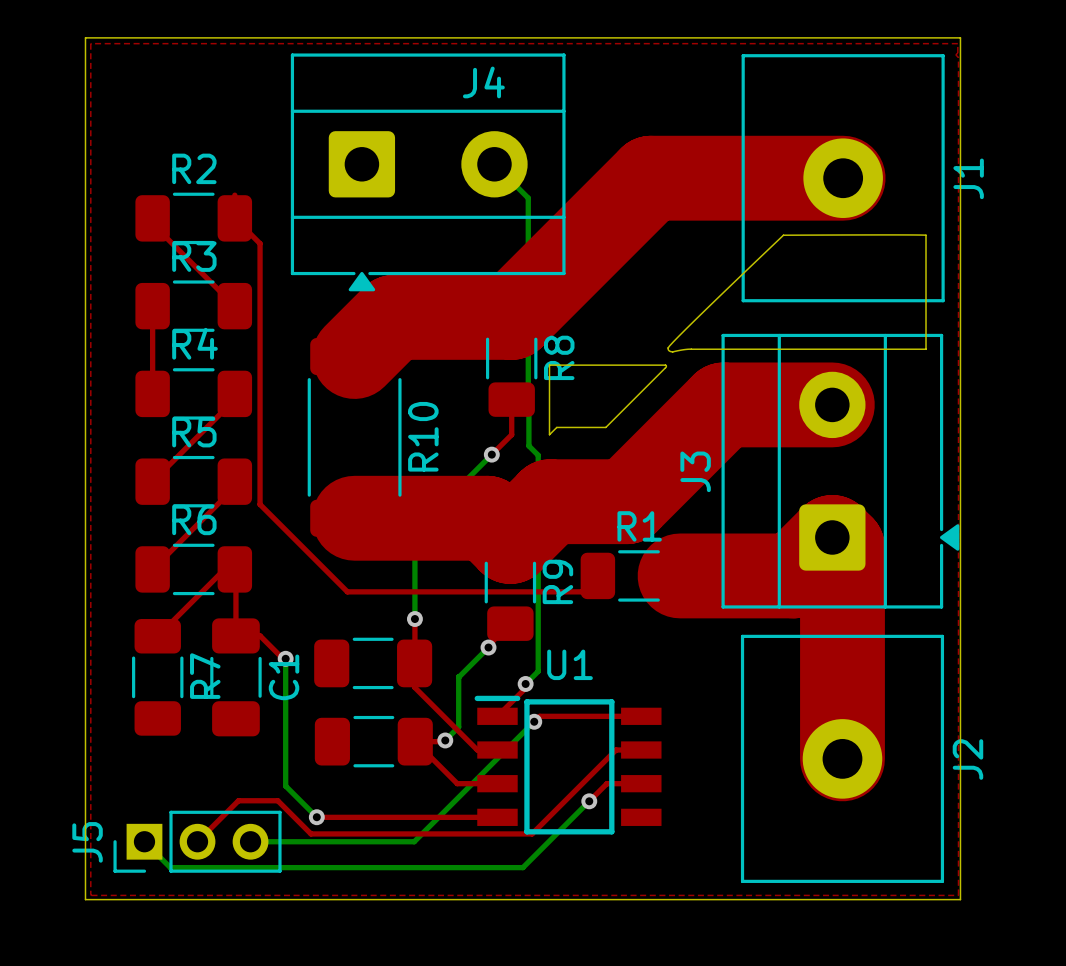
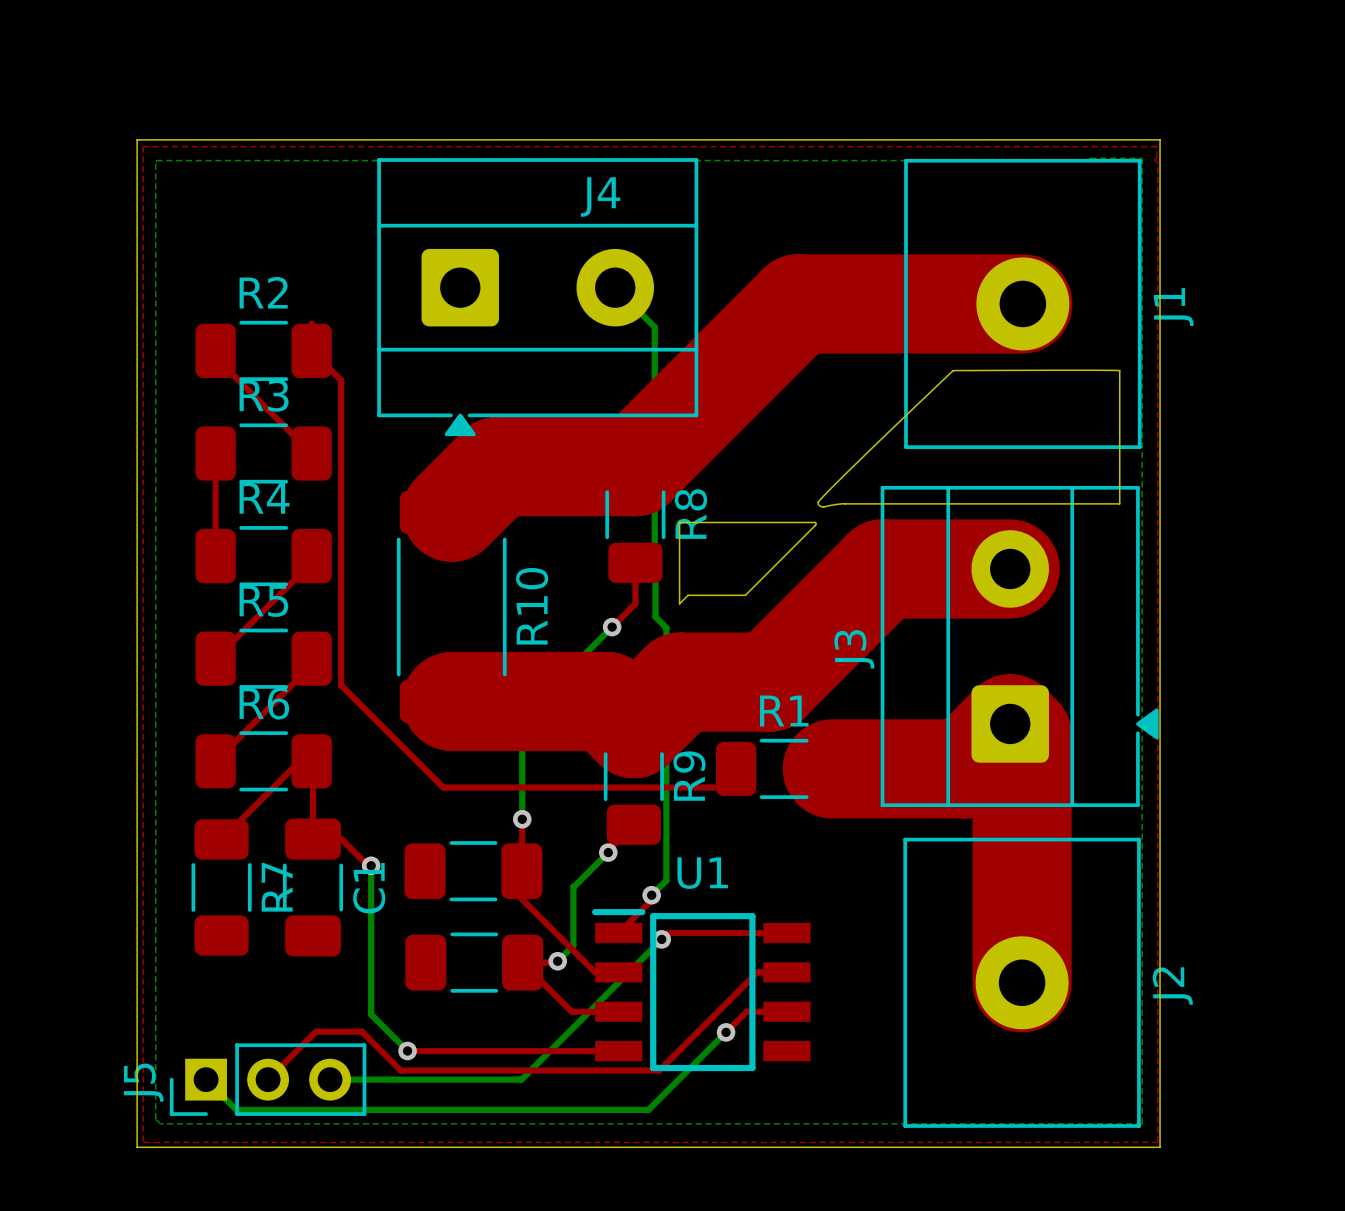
bottom zone outline: none -> (1090, 158) (1087, 160) (155, 161) (155, 1119) (160, 1123) (1142, 1123) (1142, 158) (1090, 158)

